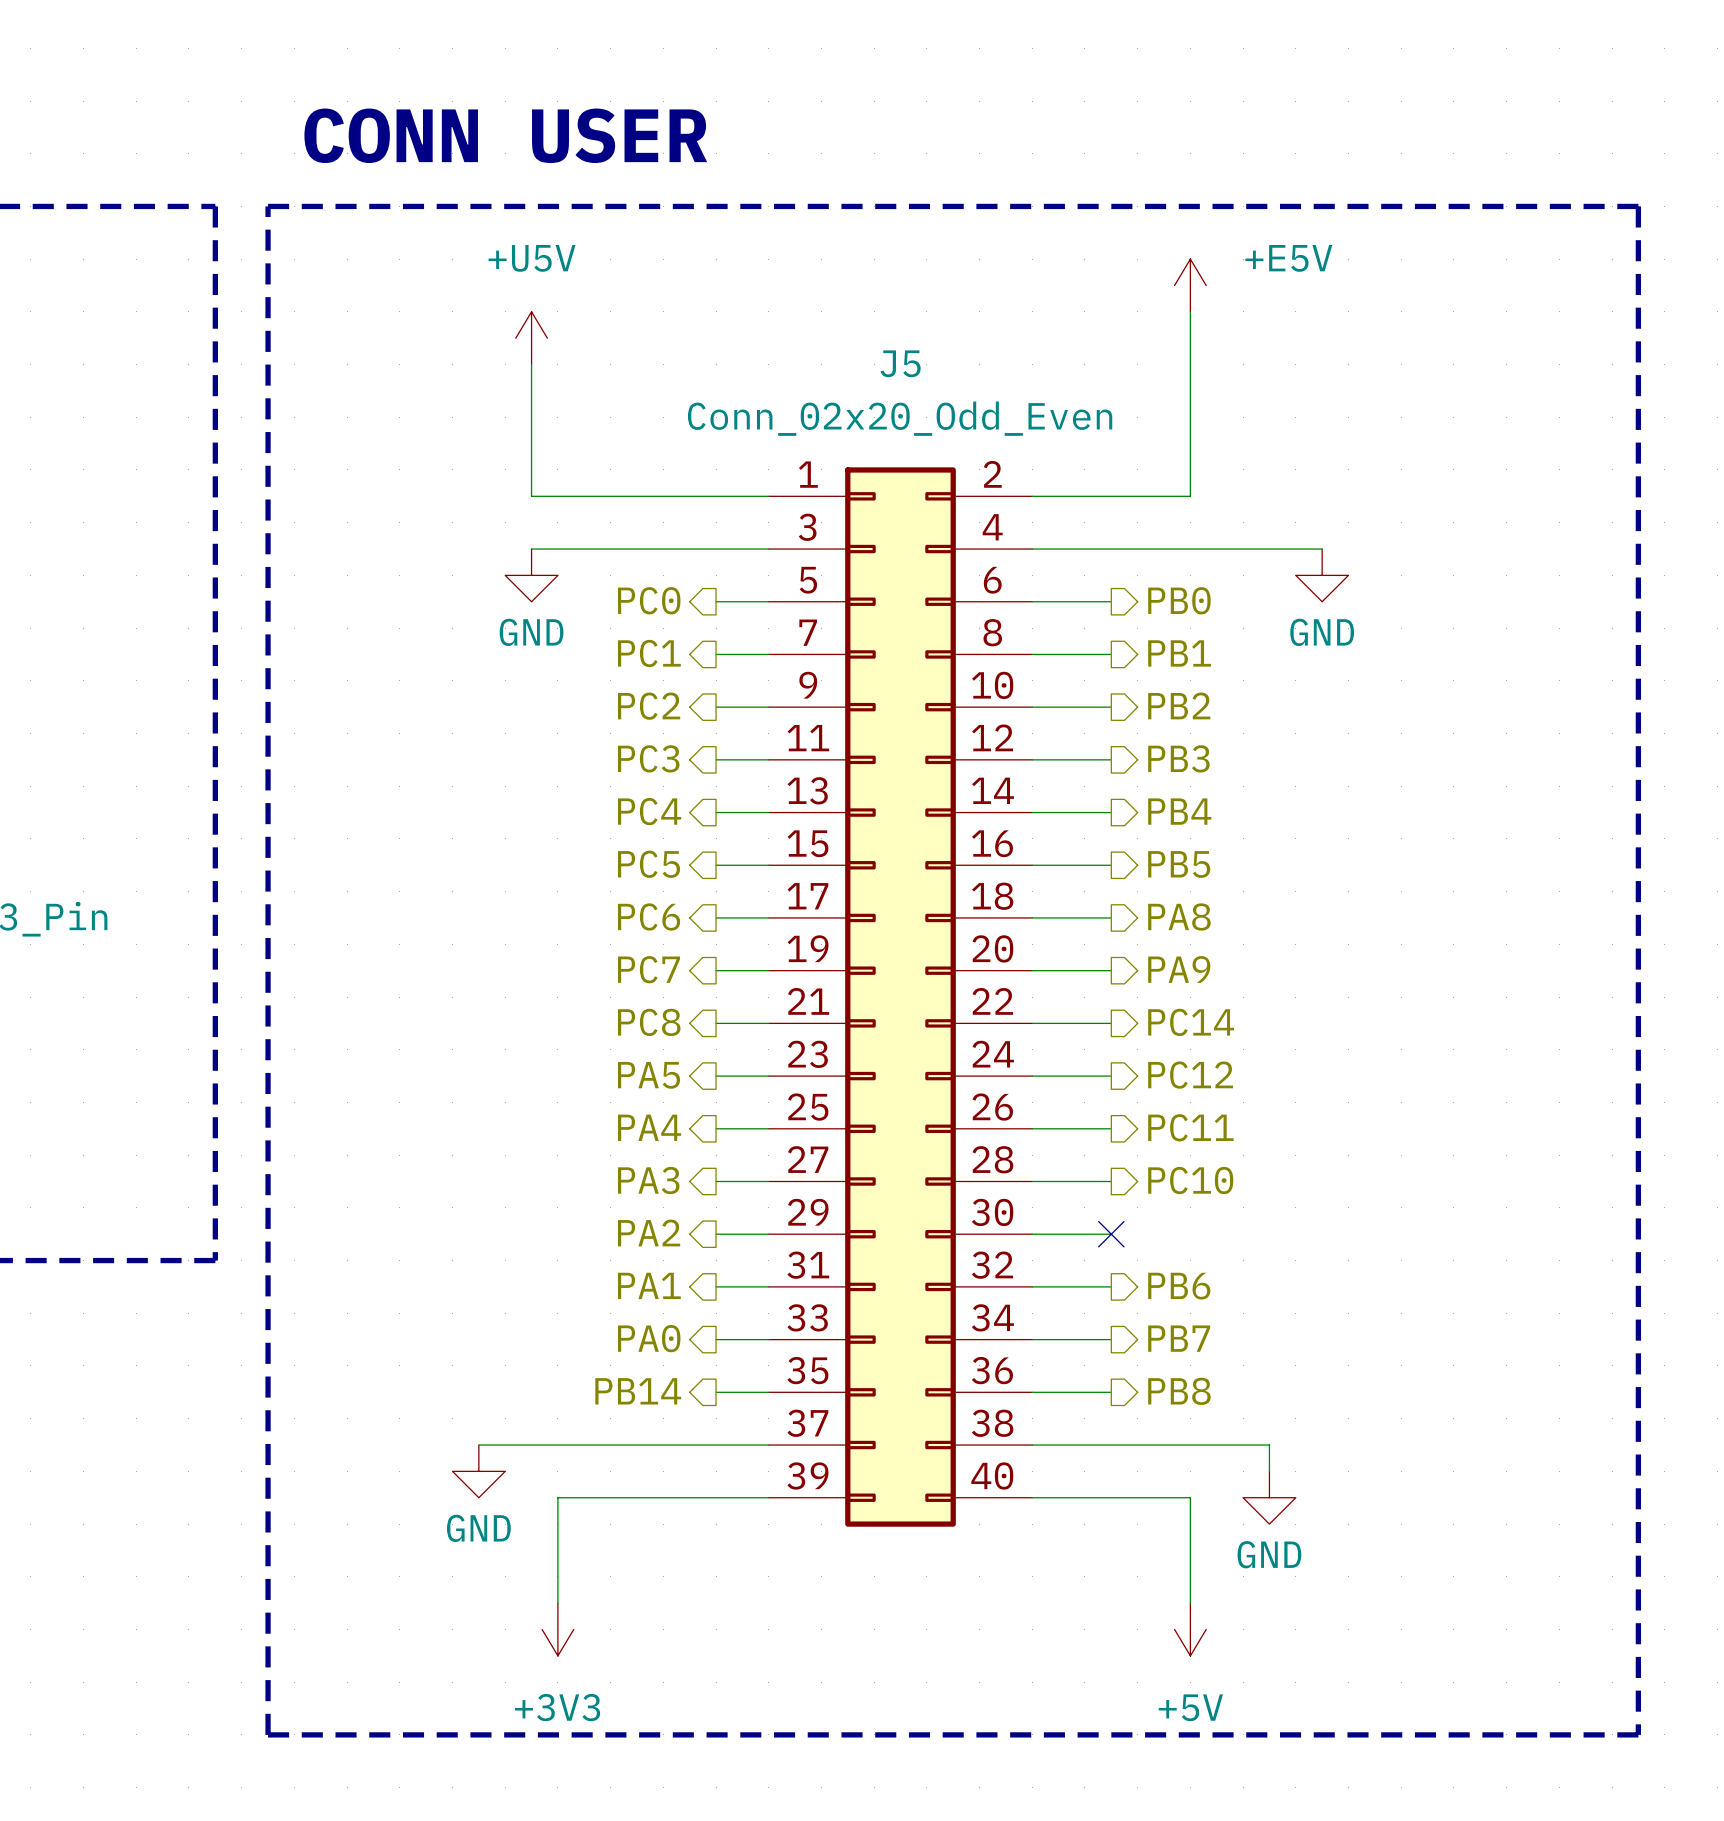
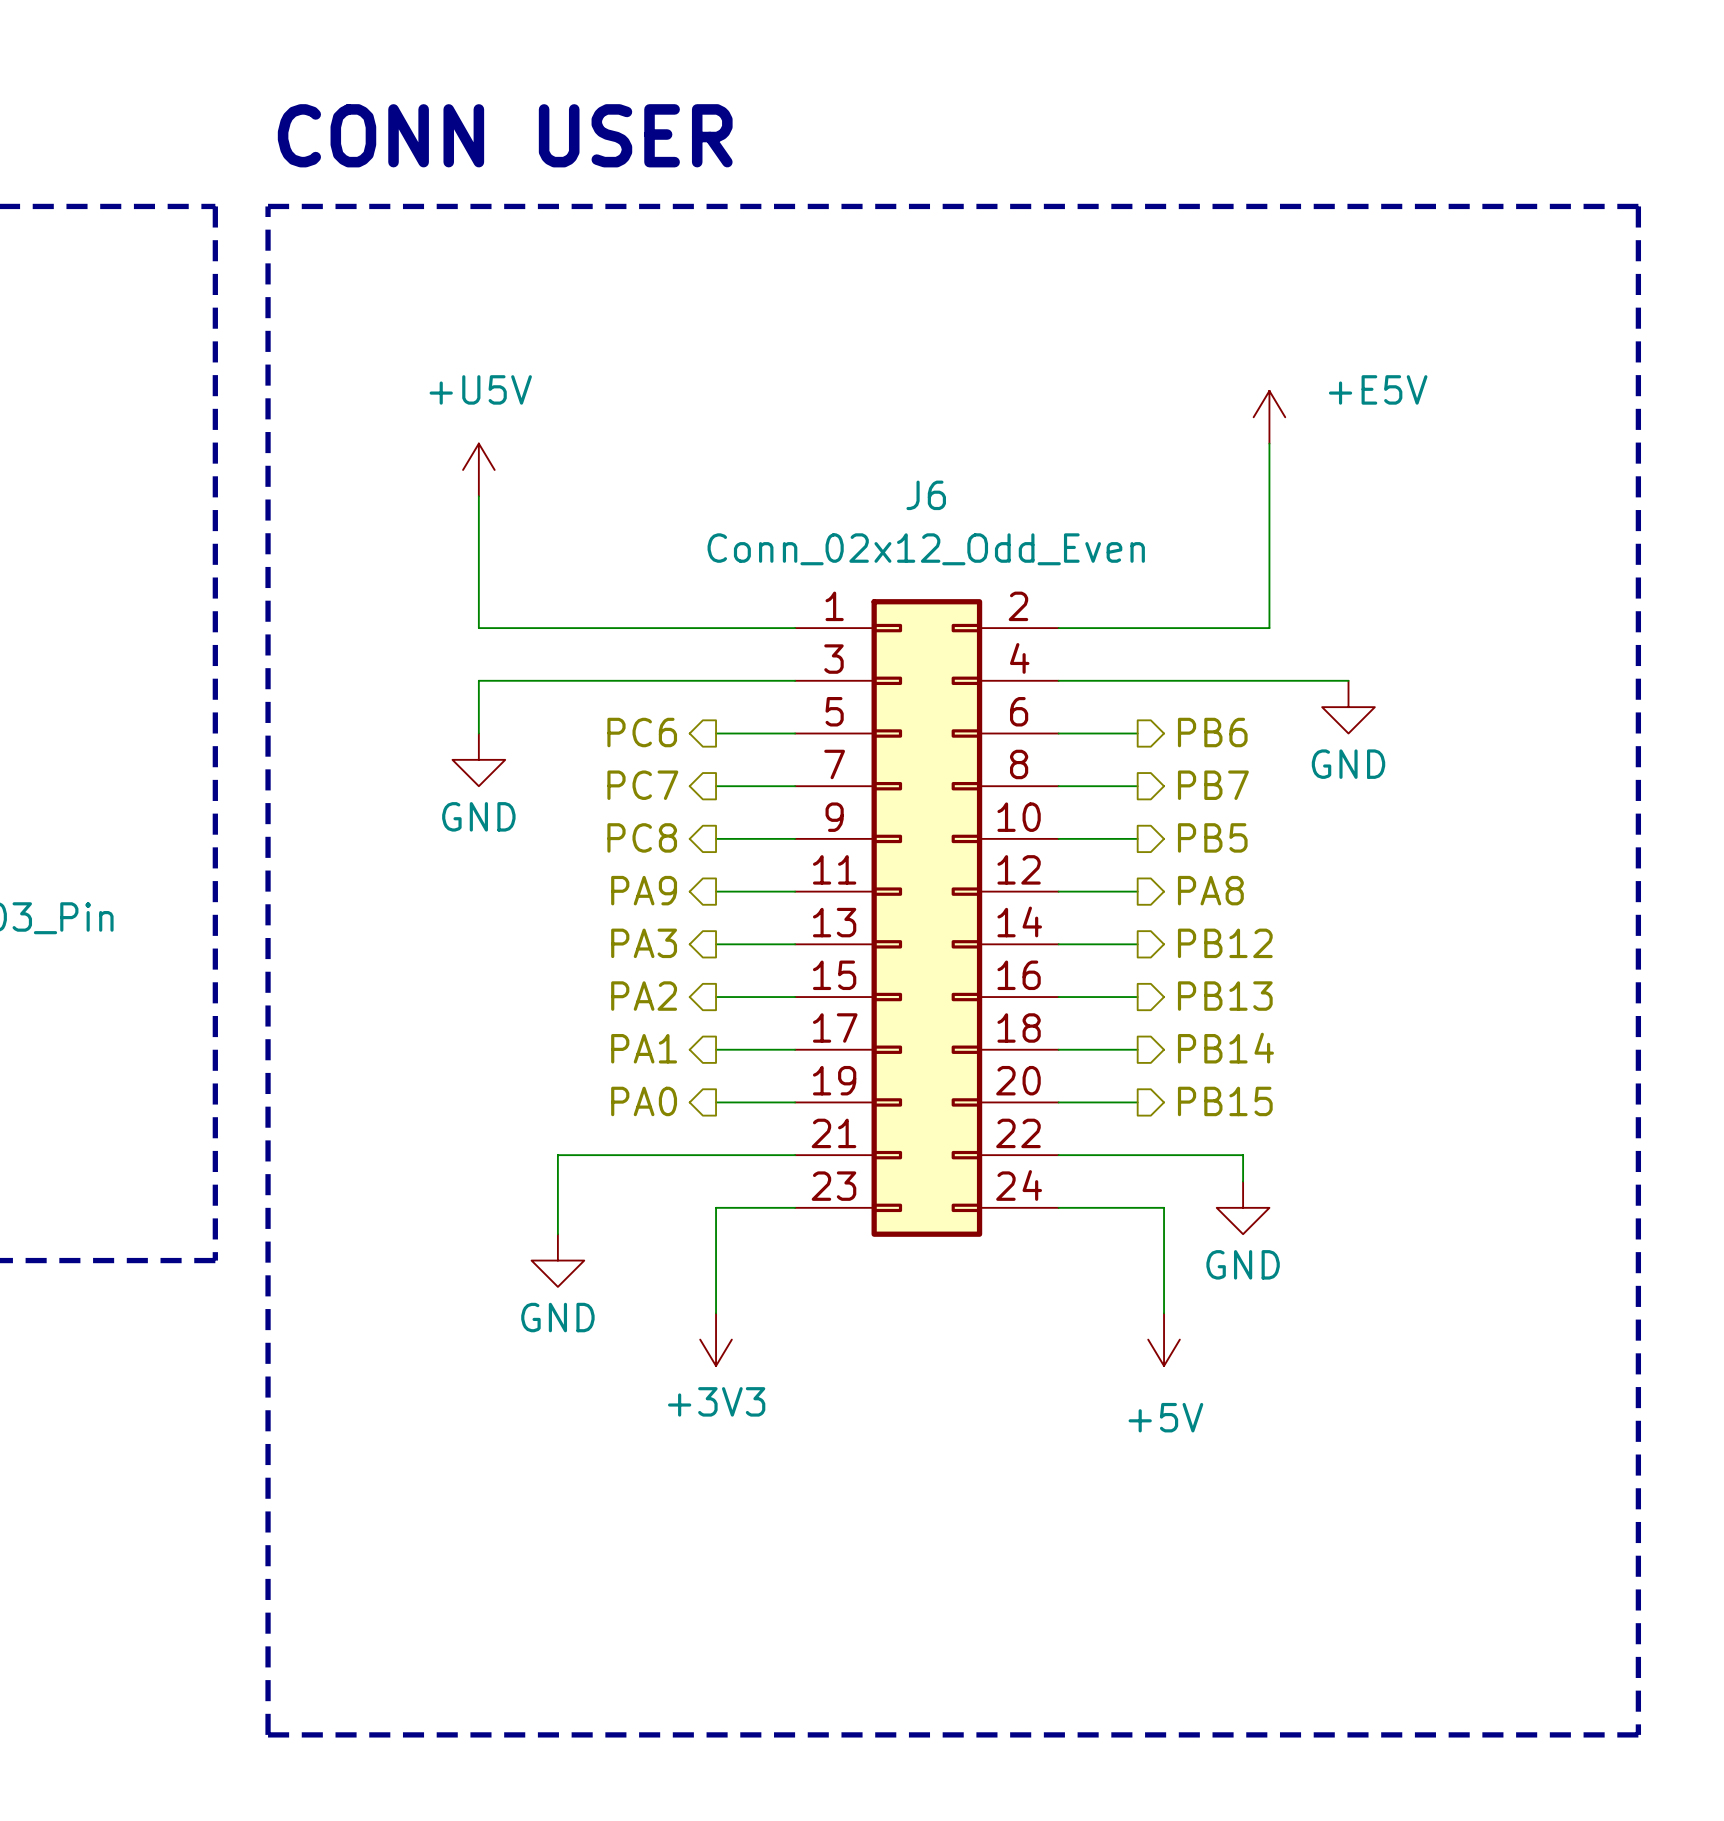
power symbol position: +E5V (1190, 285) -> +E5V (1269, 417)
wire: (1190, 311) (1190, 496) (1032, 496) -> none
power symbol position: +U5V (531, 338) -> +U5V (478, 469)
wire: (531, 364) (531, 496) (768, 496) -> none
wire: none -> (1269, 443) (1269, 628) (1058, 628)
wire: none -> (478, 496) (478, 628) (795, 628)
wire: (531, 549) (768, 549) -> none
wire: (1032, 549) (1322, 549) -> (1058, 680) (1348, 680)
power symbol position: GND (531, 575) -> GND (478, 759)
power symbol position: GND (1322, 575) -> GND (1348, 707)
hierarchical label: PC0 (649, 600) -> none
hierarchical label: PB0 (1179, 600) -> none
wire: (716, 601) (768, 601) -> none
wire: (1032, 601) (1111, 601) -> (1058, 733) (1137, 733)
hierarchical label: PC1 (649, 653) -> none
hierarchical label: PB1 (1179, 653) -> none
wire: (716, 654) (768, 654) -> none
wire: (1032, 654) (1111, 654) -> (1058, 786) (1137, 786)
wire: none -> (795, 680) (478, 680) (478, 733)
hierarchical label: PB2 (1179, 705) -> none
hierarchical label: PC2 (649, 706) -> none
wire: (716, 707) (768, 707) -> none
wire: (1032, 707) (1111, 707) -> (1058, 838) (1137, 838)
hierarchical label: none -> PB6 (1212, 732)
wire: none -> (716, 733) (795, 733)
hierarchical label: PC3 (648, 758) -> none
hierarchical label: PB3 (1178, 758) -> none
wire: (716, 759) (768, 759) -> none
wire: (1032, 759) (1111, 759) -> (1058, 891) (1137, 891)
hierarchical label: none -> PB7 (1213, 785)
wire: none -> (716, 786) (795, 786)
hierarchical label: PC4 (649, 811) -> none
hierarchical label: PB4 (1179, 811) -> none
wire: (716, 812) (768, 812) -> none
wire: (1032, 812) (1111, 812) -> (1058, 944) (1137, 944)
wire: none -> (716, 838) (795, 838)
hierarchical label: PC5 (649, 864) -> none
hierarchical label position: PB5 (1179, 864) -> PB5 (1212, 837)
wire: (716, 865) (768, 865) -> none
wire: (1032, 865) (1111, 865) -> (1058, 997) (1137, 997)
hierarchical label position: PC6 (649, 916) -> PC6 (642, 732)
hierarchical label position: PA8 (1179, 916) -> PA8 (1210, 890)
wire: (716, 917) (768, 917) -> none
J6: none -> Conn_02x12_Odd_Even (926, 917)
wire: (1032, 917) (1111, 917) -> (1058, 1049) (1137, 1049)
hierarchical label: none -> PB12 (1225, 943)
hierarchical label position: PC7 (648, 969) -> PC7 (642, 785)
hierarchical label rotation: 0° (1179, 969) -> 180° (644, 890)
hierarchical label position: PA9 (1179, 969) -> PA9 (644, 890)
wire: (716, 970) (768, 970) -> none
wire: (1032, 970) (1111, 970) -> (1058, 1102) (1137, 1102)
hierarchical label: none -> PB13 (1225, 996)
J5: Conn_02x20_Odd_Even (900, 997) -> none
hierarchical label position: PC8 (649, 1022) -> PC8 (642, 837)
hierarchical label: PC14 (1191, 1022) -> PB14 (1225, 1048)
wire: (716, 1023) (768, 1023) -> none
wire: (1032, 1023) (1111, 1023) -> (716, 997) (795, 997)
hierarchical label: PA5 (649, 1075) -> none
hierarchical label: PC12 (1190, 1075) -> none
wire: (716, 1076) (768, 1076) -> none
wire: (1032, 1076) (1111, 1076) -> (716, 1049) (795, 1049)
hierarchical label: none -> PB15 (1225, 1101)
hierarchical label: PA4 (649, 1127) -> none
hierarchical label: PC11 (1190, 1127) -> none
wire: (716, 1128) (768, 1128) -> none
wire: (1032, 1128) (1111, 1128) -> (716, 1102) (795, 1102)
wire: none -> (795, 1155) (557, 1155) (557, 1234)
wire: none -> (1058, 1155) (1243, 1155) (1243, 1181)
hierarchical label position: PA3 (648, 1180) -> PA3 (644, 943)
hierarchical label: PC10 (1190, 1180) -> none
wire: (716, 1181) (768, 1181) -> none
wire: (1032, 1181) (1111, 1181) -> (716, 944) (795, 944)
wire: none -> (795, 1207) (716, 1207) (716, 1313)
wire: none -> (1058, 1207) (1164, 1207) (1164, 1313)
hierarchical label position: PA2 (649, 1232) -> PA2 (644, 996)
wire: (716, 1234) (768, 1234) -> none
wire: (1032, 1234) (1111, 1234) -> (716, 891) (795, 891)
no-connect mark: (1111, 1234) -> none
hierarchical label position: PA1 (649, 1285) -> PA1 (644, 1048)
wire: (716, 1286) (768, 1286) -> none
wire: (1032, 1286) (1111, 1286) -> none
hierarchical label: PB6 (1179, 1286) -> none
hierarchical label position: PA0 (649, 1338) -> PA0 (644, 1101)
hierarchical label: PB7 (1179, 1338) -> none
wire: (716, 1339) (768, 1339) -> none
wire: (1032, 1339) (1111, 1339) -> none
hierarchical label: PB14 (638, 1391) -> none
hierarchical label: PB8 (1179, 1391) -> none
wire: (716, 1392) (768, 1392) -> none
wire: (1032, 1392) (1111, 1392) -> none
wire: (478, 1445) (768, 1445) -> none
wire: (1032, 1445) (1269, 1445) (1269, 1471) -> none
power symbol position: GND (478, 1471) -> GND (557, 1260)
wire: (768, 1497) (557, 1497) (557, 1603) -> none
wire: (1032, 1497) (1190, 1497) (1190, 1603) -> none
power symbol position: GND (1269, 1497) -> GND (1243, 1207)
power symbol position: +3V3 (557, 1629) -> +3V3 (716, 1339)
power symbol position: +5V (1190, 1629) -> +5V (1164, 1339)
power symbol text position: +3V3 (557, 1707) -> +3V3 (716, 1401)

